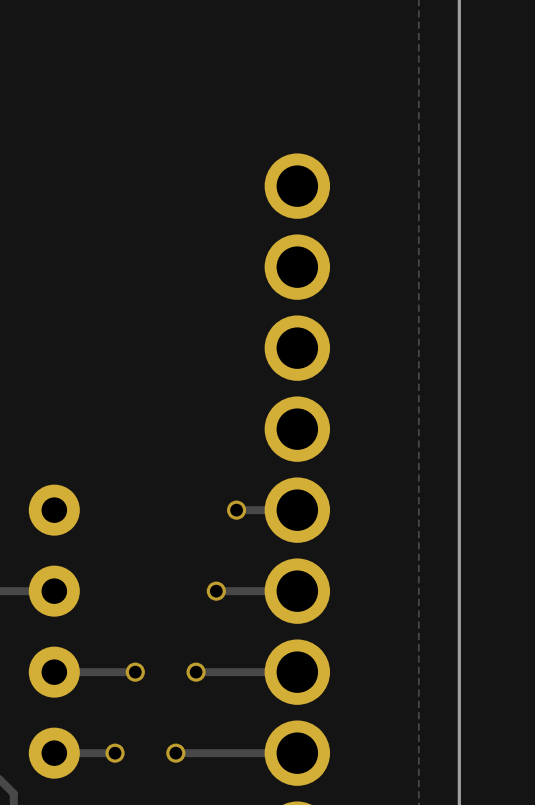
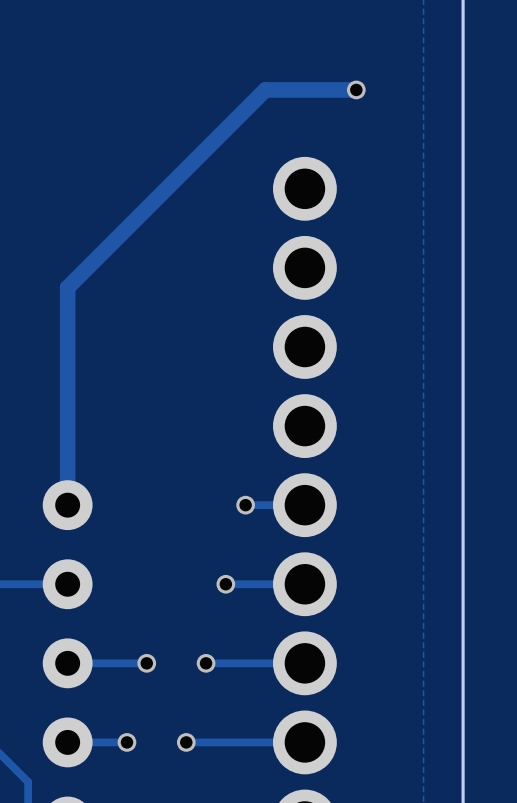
track: none -> (356, 89) (265, 89) (67, 287) (67, 505)
via: none -> (356, 89)

